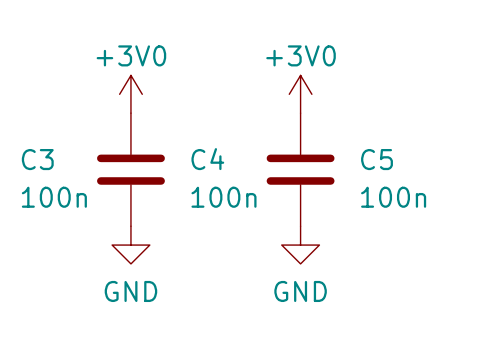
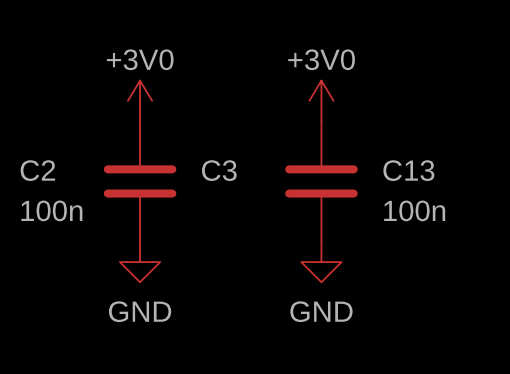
C3 name: C3 (37, 159) -> C2 (37, 170)
C4 name: C4 (207, 159) -> C3 (219, 170)
C5 name: C5 (377, 159) -> C13 (408, 170)
C4 value: 100n (223, 197) -> none

